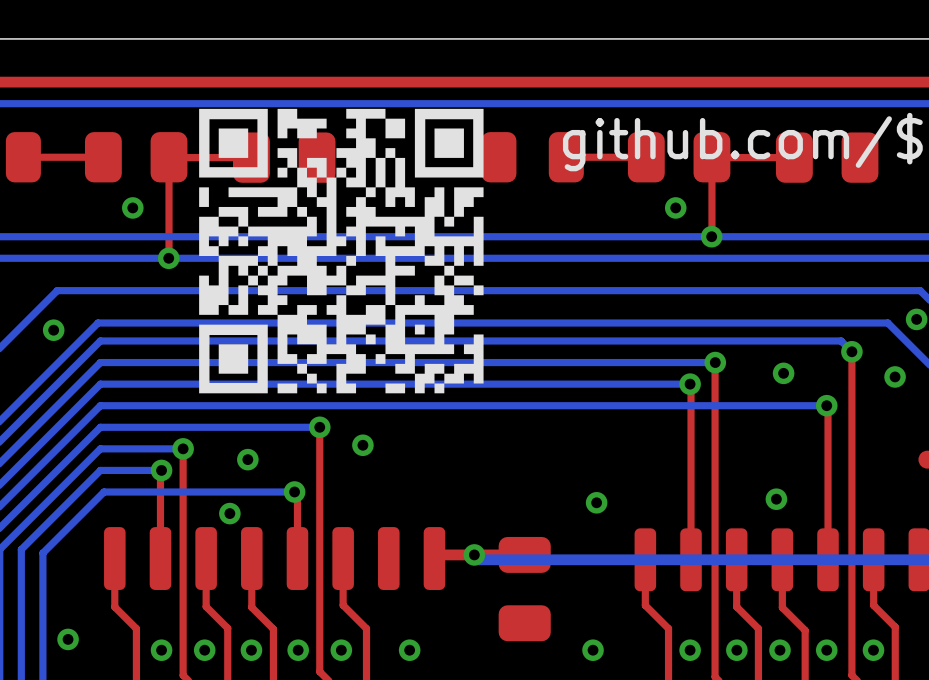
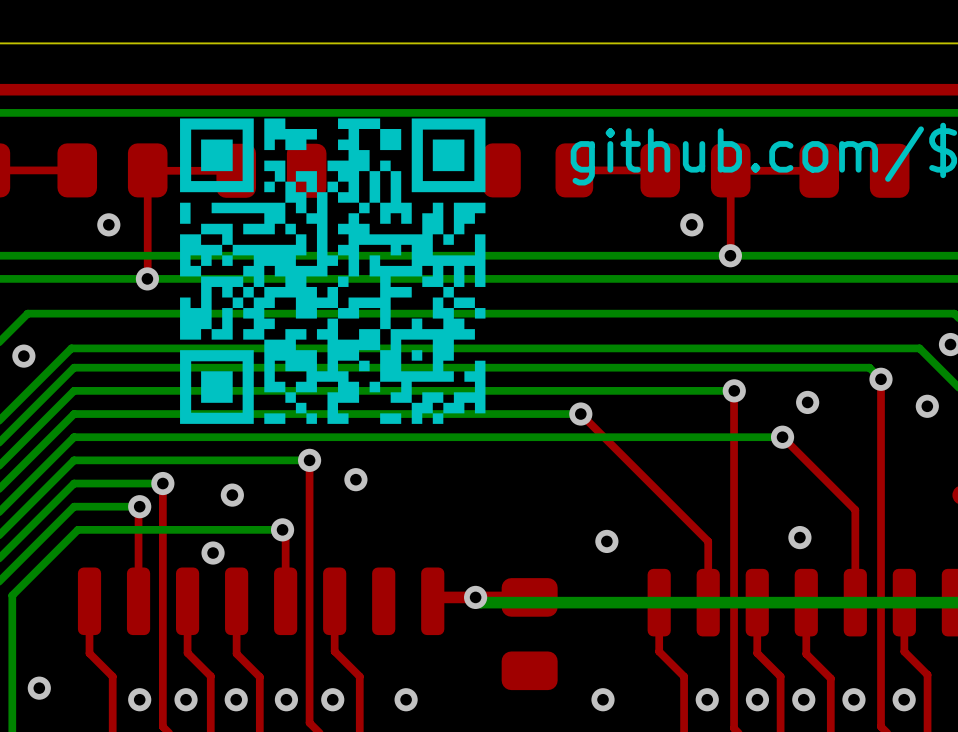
via: none -> (580, 414)
top track: (690, 384) (691, 502) -> (580, 414) (708, 541)
bottom track: (690, 384) (572, 384) -> none
via: (690, 384) -> none
via: none -> (782, 437)
top track: (826, 405) (828, 473) -> (782, 437) (855, 509)
bottom track: (826, 405) (760, 405) -> none
via: (826, 405) -> none

